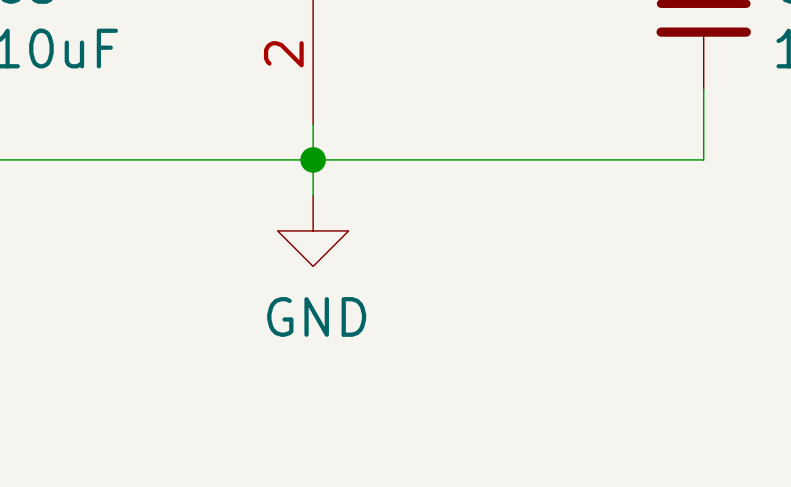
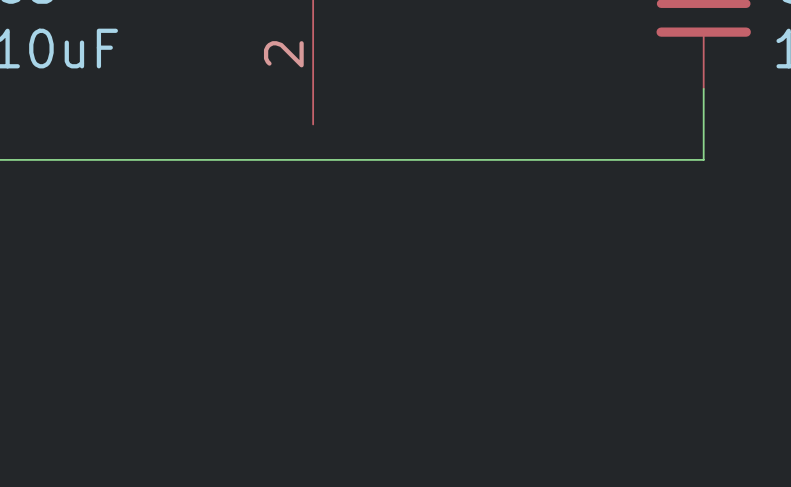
wire: (313, 124) (313, 195) -> none
junction: (313, 159) -> none
power symbol: GND (313, 230) -> none

